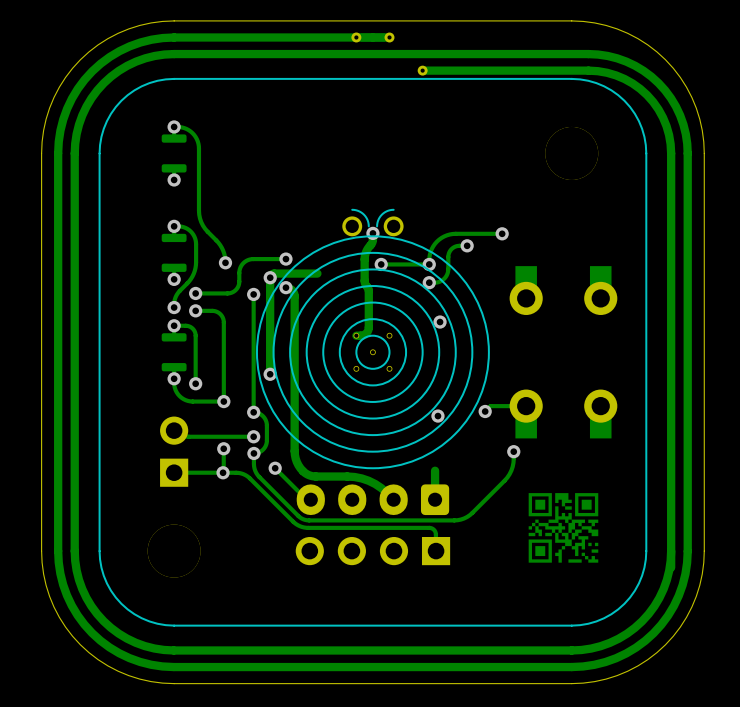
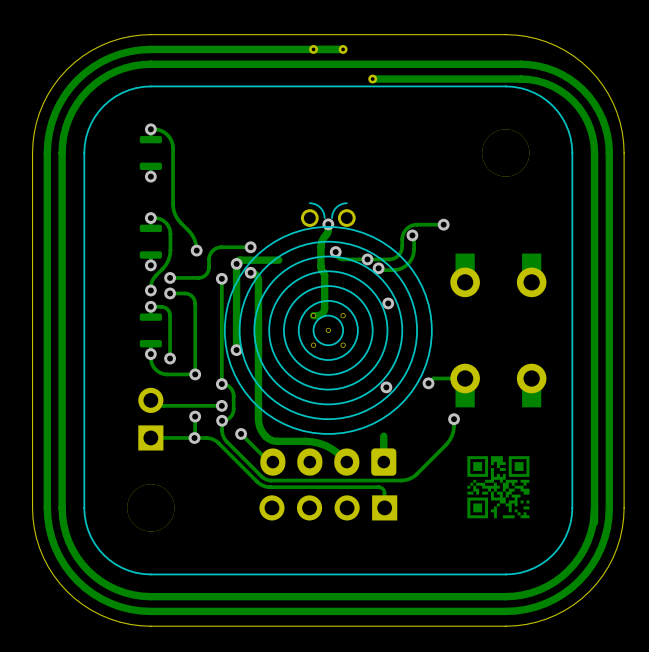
track: (472, 233) (449, 234) (439, 239) (430, 251) (429, 264) (381, 264) -> (417, 224) (405, 230) (402, 236) (401, 251) (392, 259) (342, 259) (337, 257) (335, 251)
track: (467, 245) (457, 246) (451, 249) (448, 254) (446, 275) (439, 281) (429, 282) -> none
track: none -> (414, 237) (413, 254) (408, 263) (397, 269) (381, 270)
via position: (429, 264) -> (367, 259)

